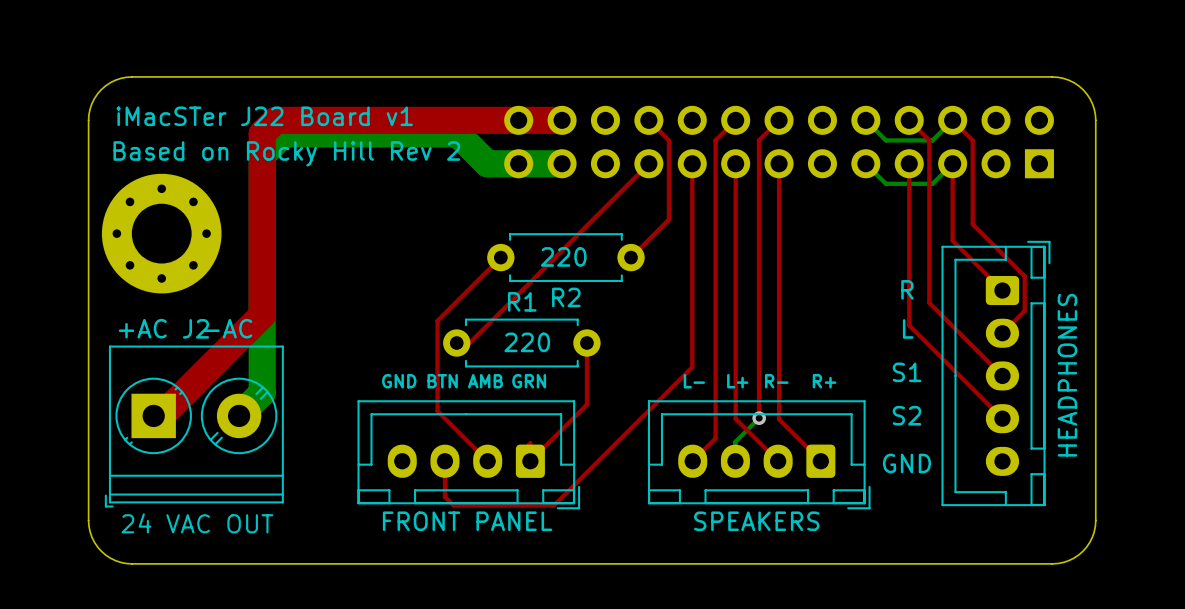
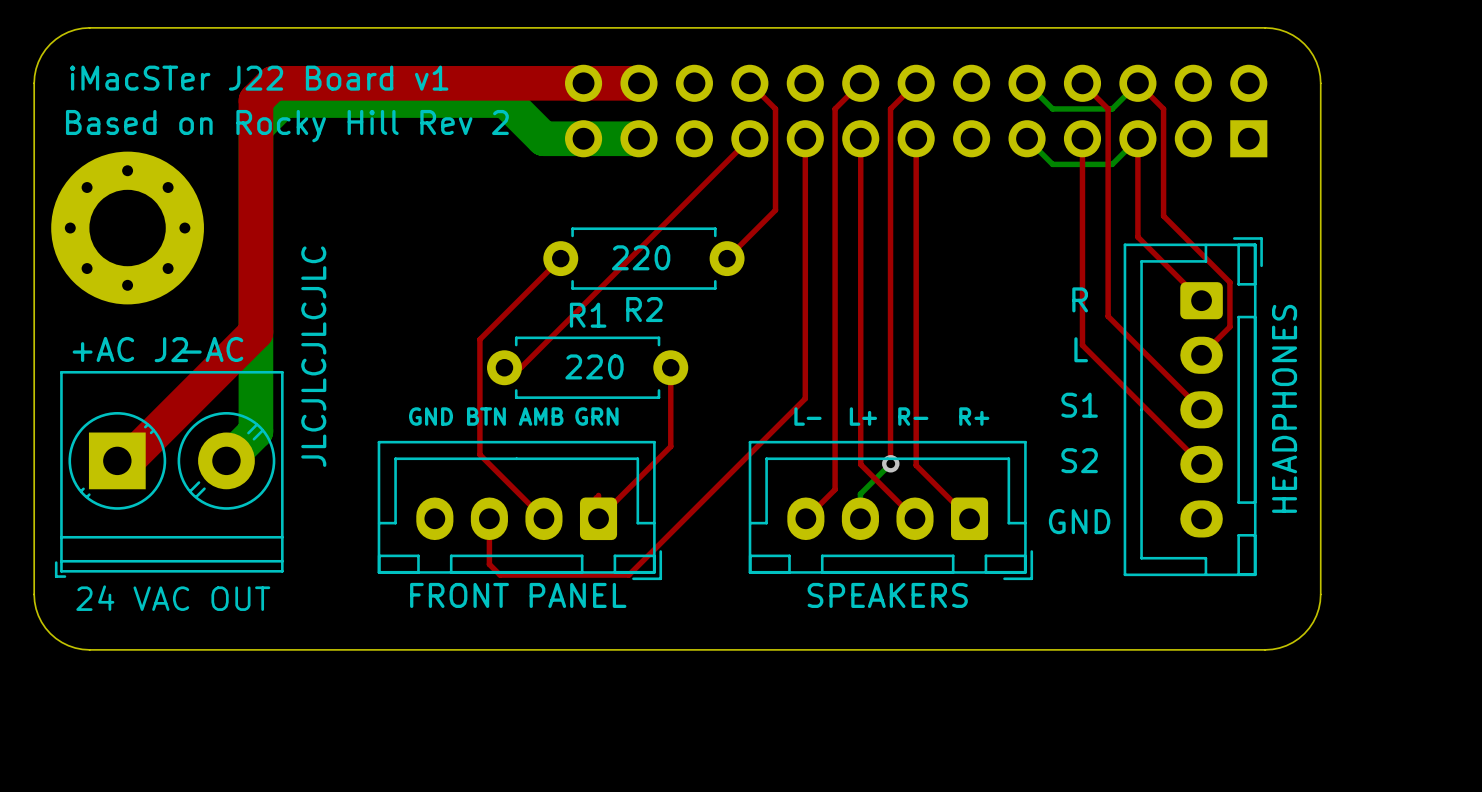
text: none -> JLCJLCJLCJLC (313, 356)

